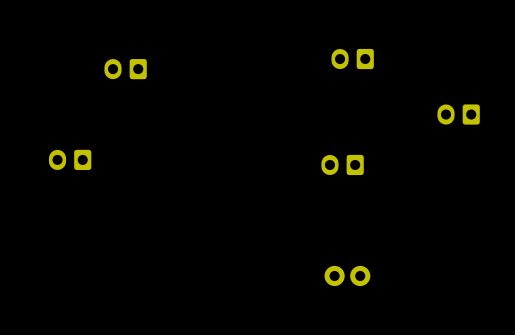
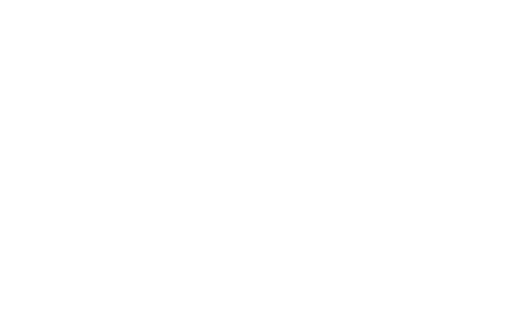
part: (352, 59) -> none
part: (125, 69) -> none
part: (458, 114) -> none
part: (70, 159) -> none
part: (342, 164) -> none
part: (347, 275) -> none

